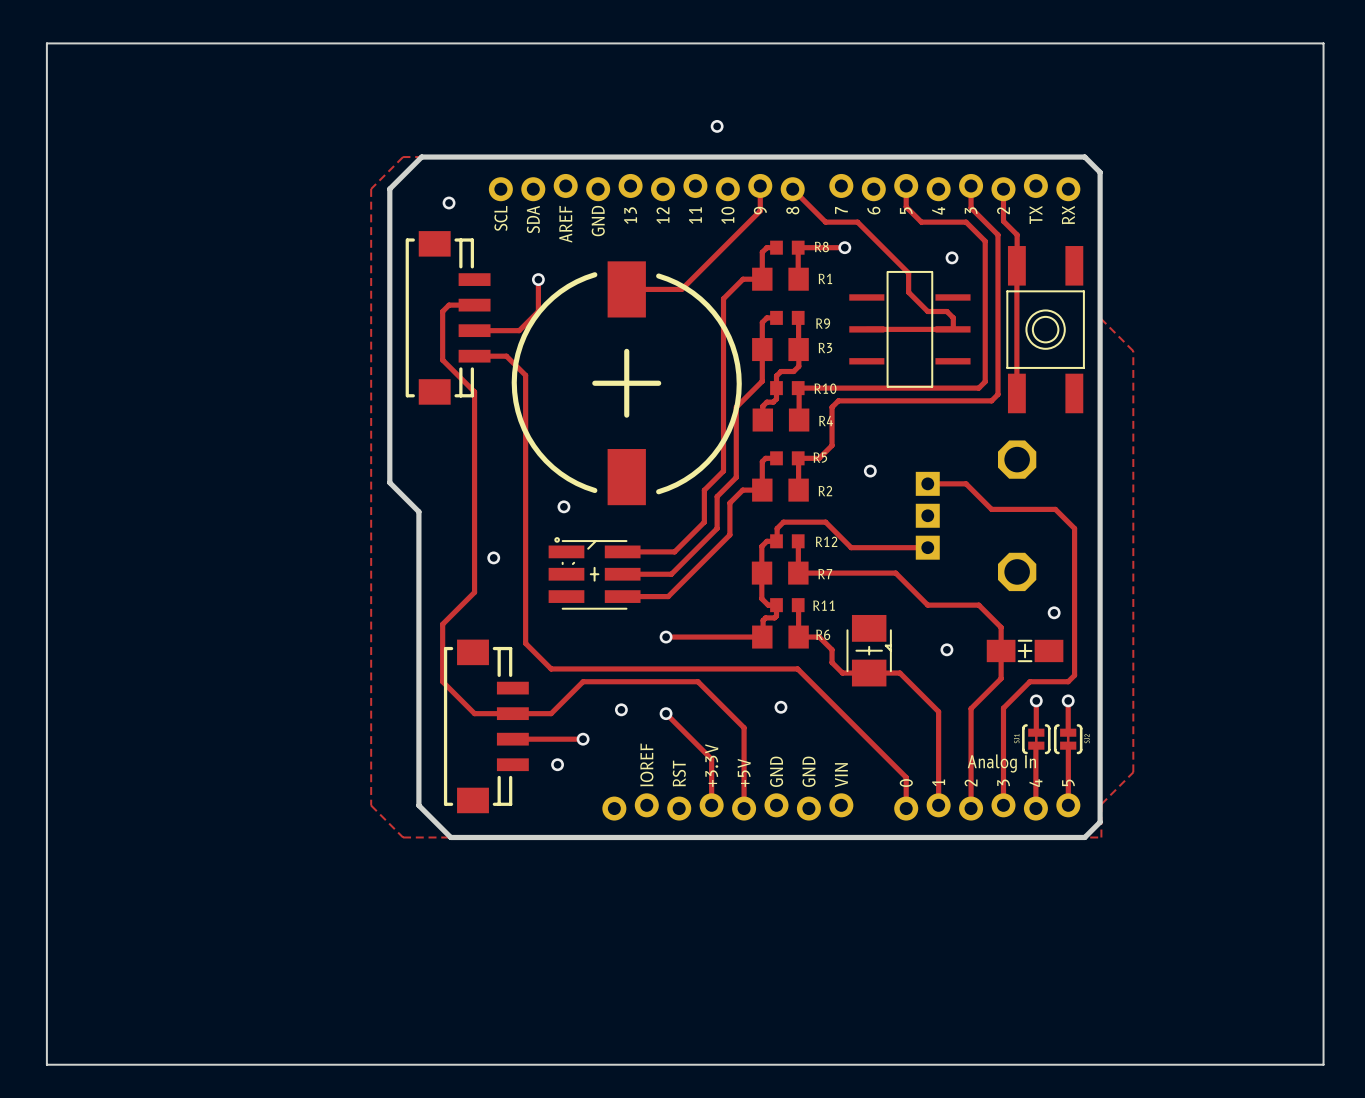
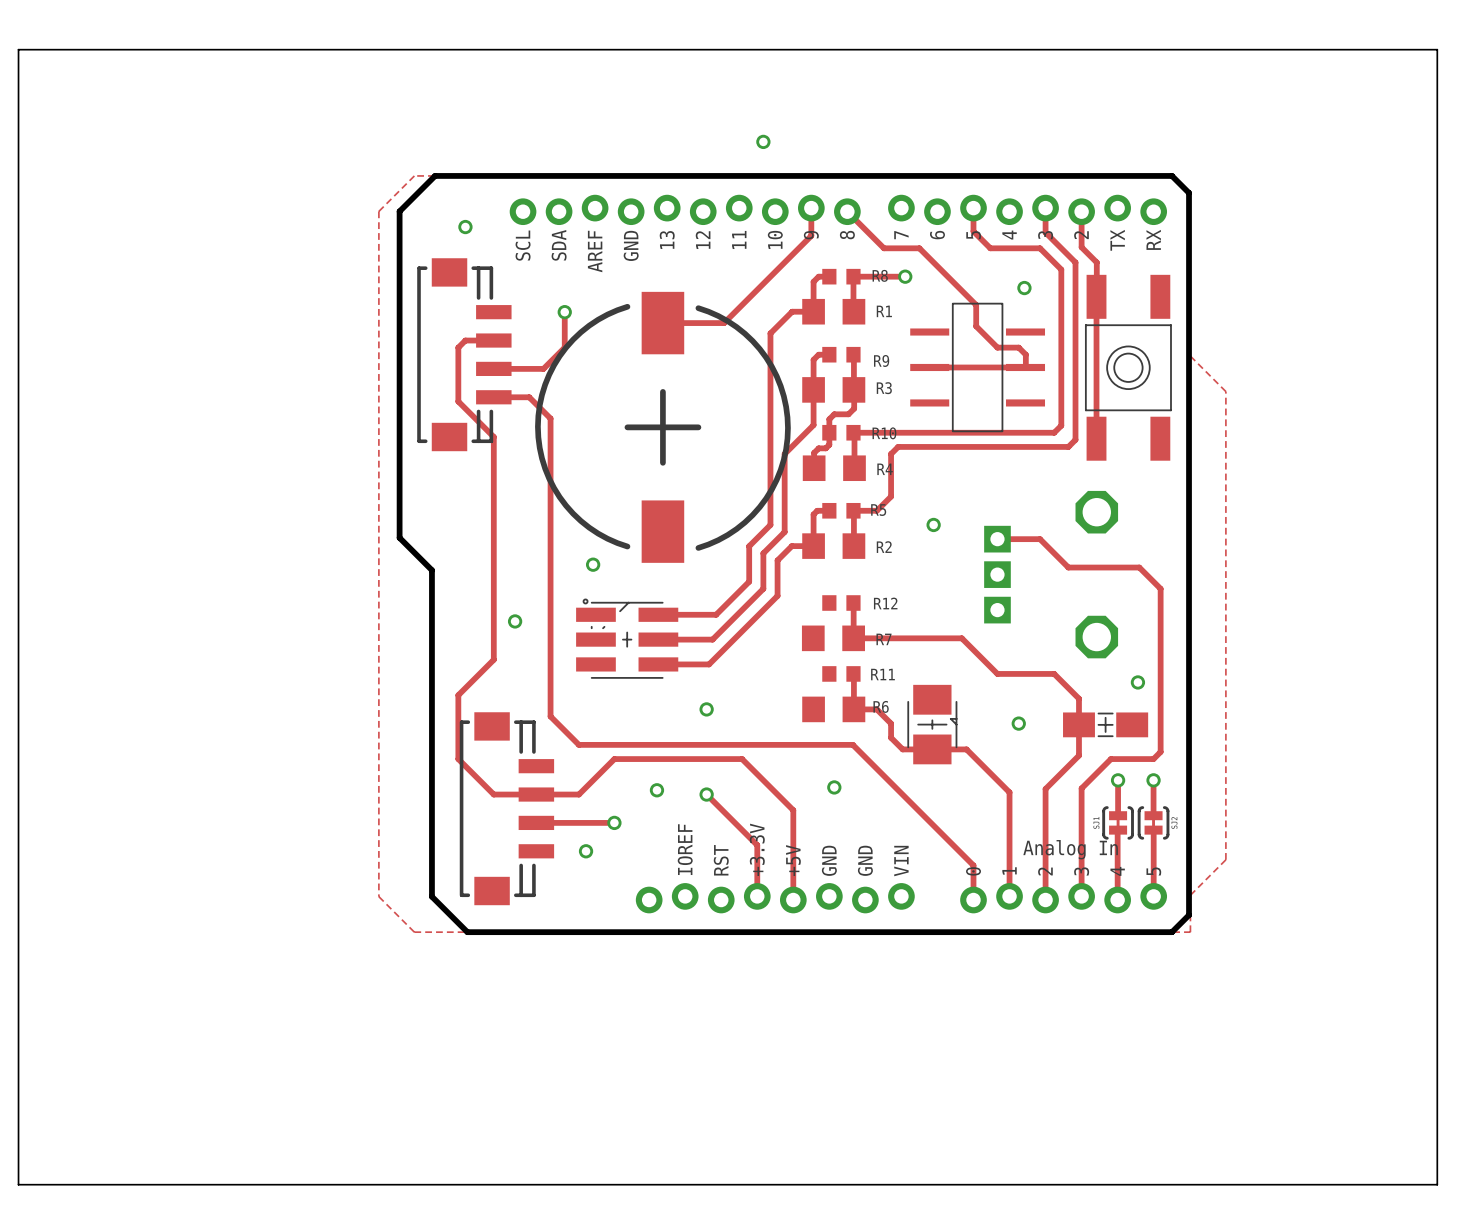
track: (927, 547) (851, 547) (825, 522) (783, 522) (777, 528) (777, 540) (766, 541) (761, 546) (761, 598) (768, 605) (776, 605) (776, 615) (774, 617) (765, 617) (763, 620) (762, 637) (666, 637) -> none

